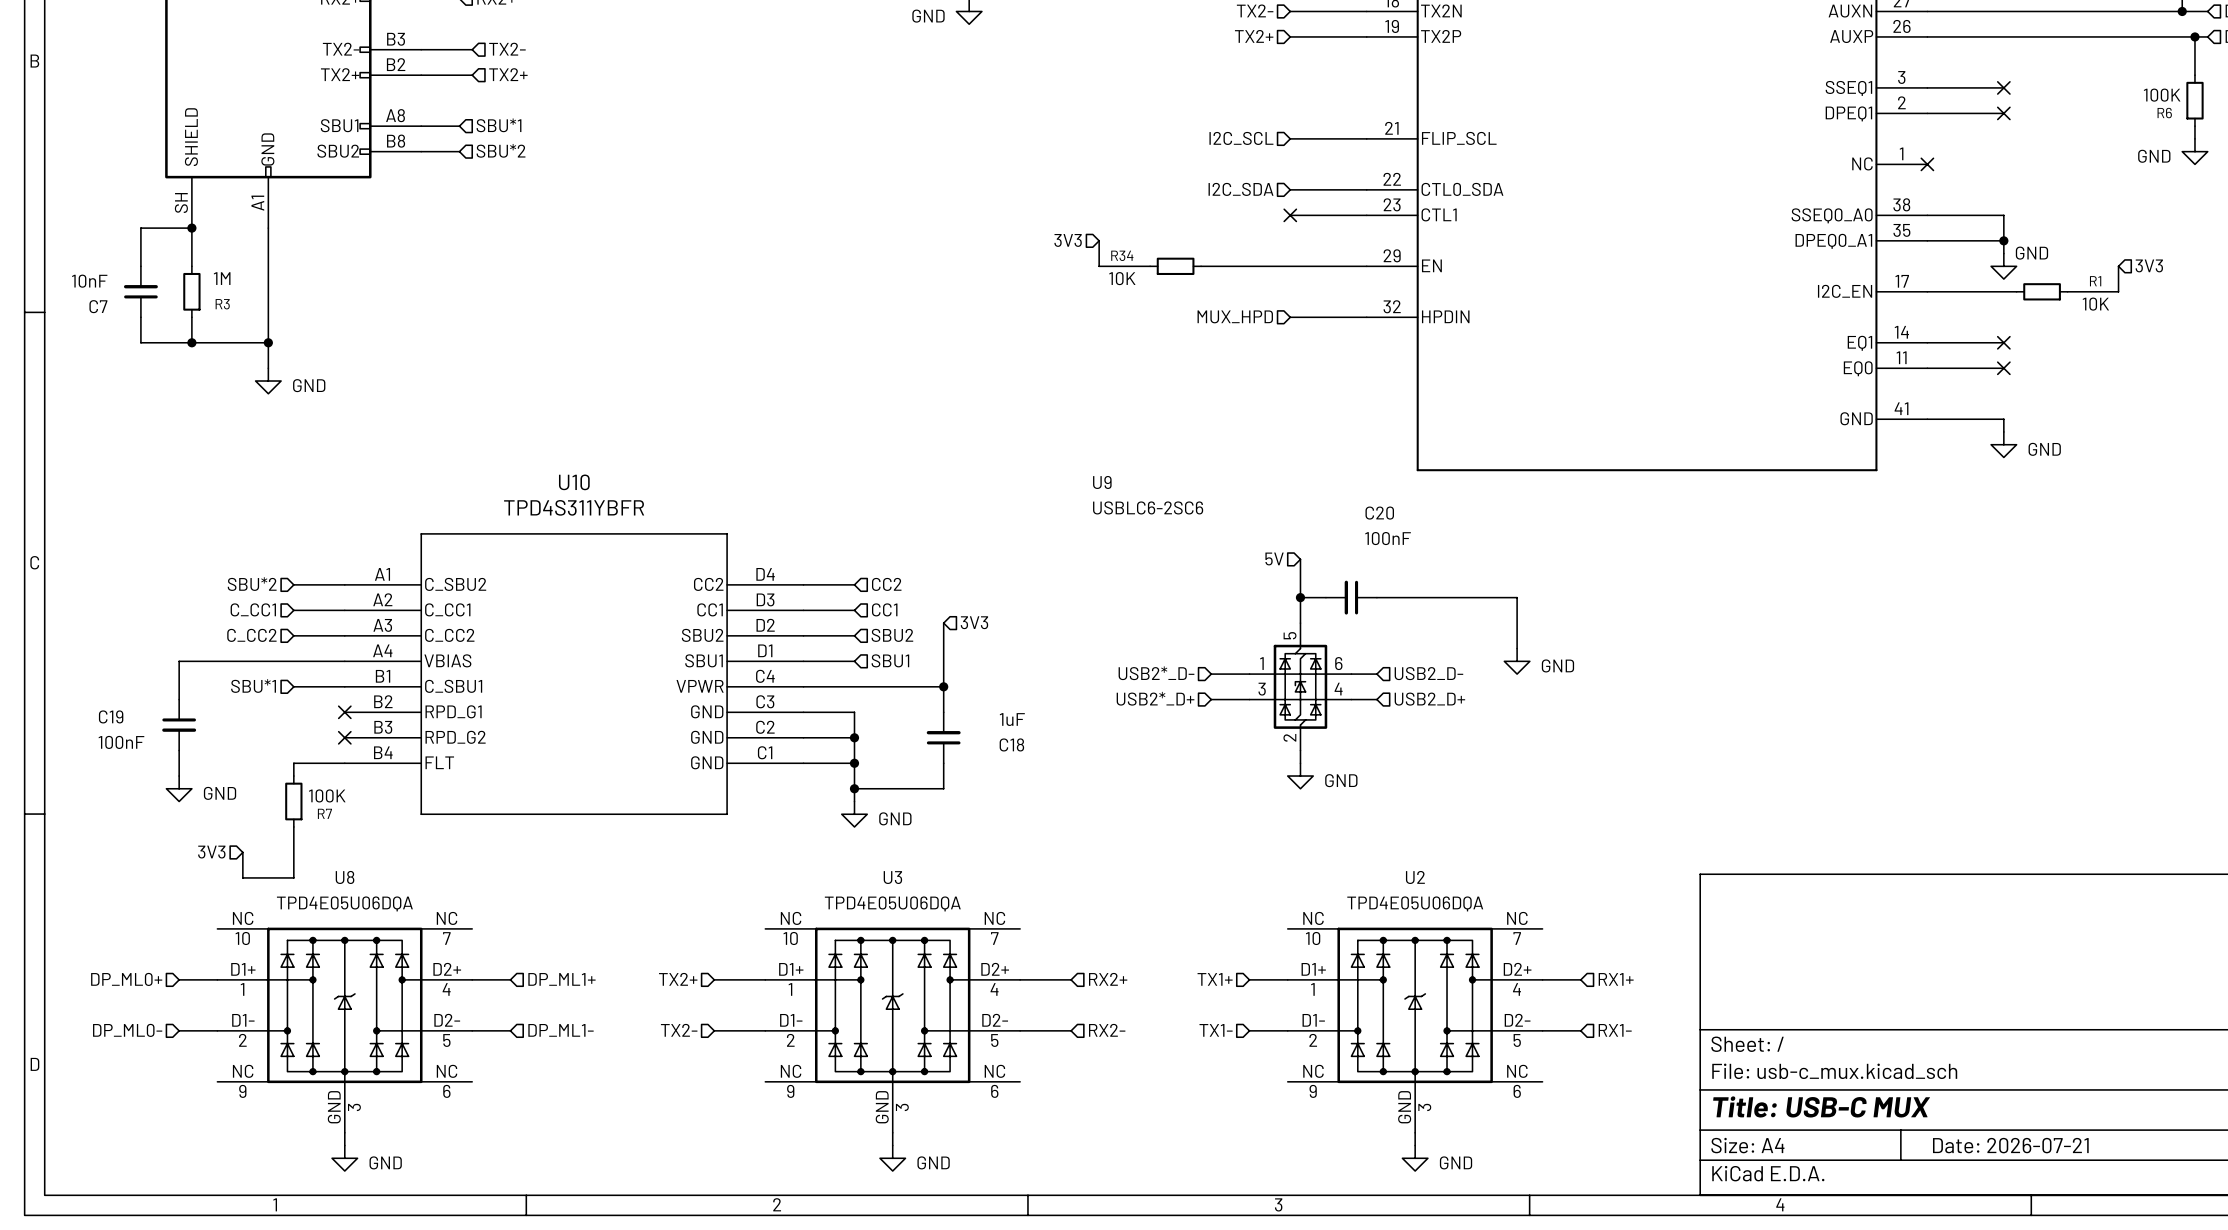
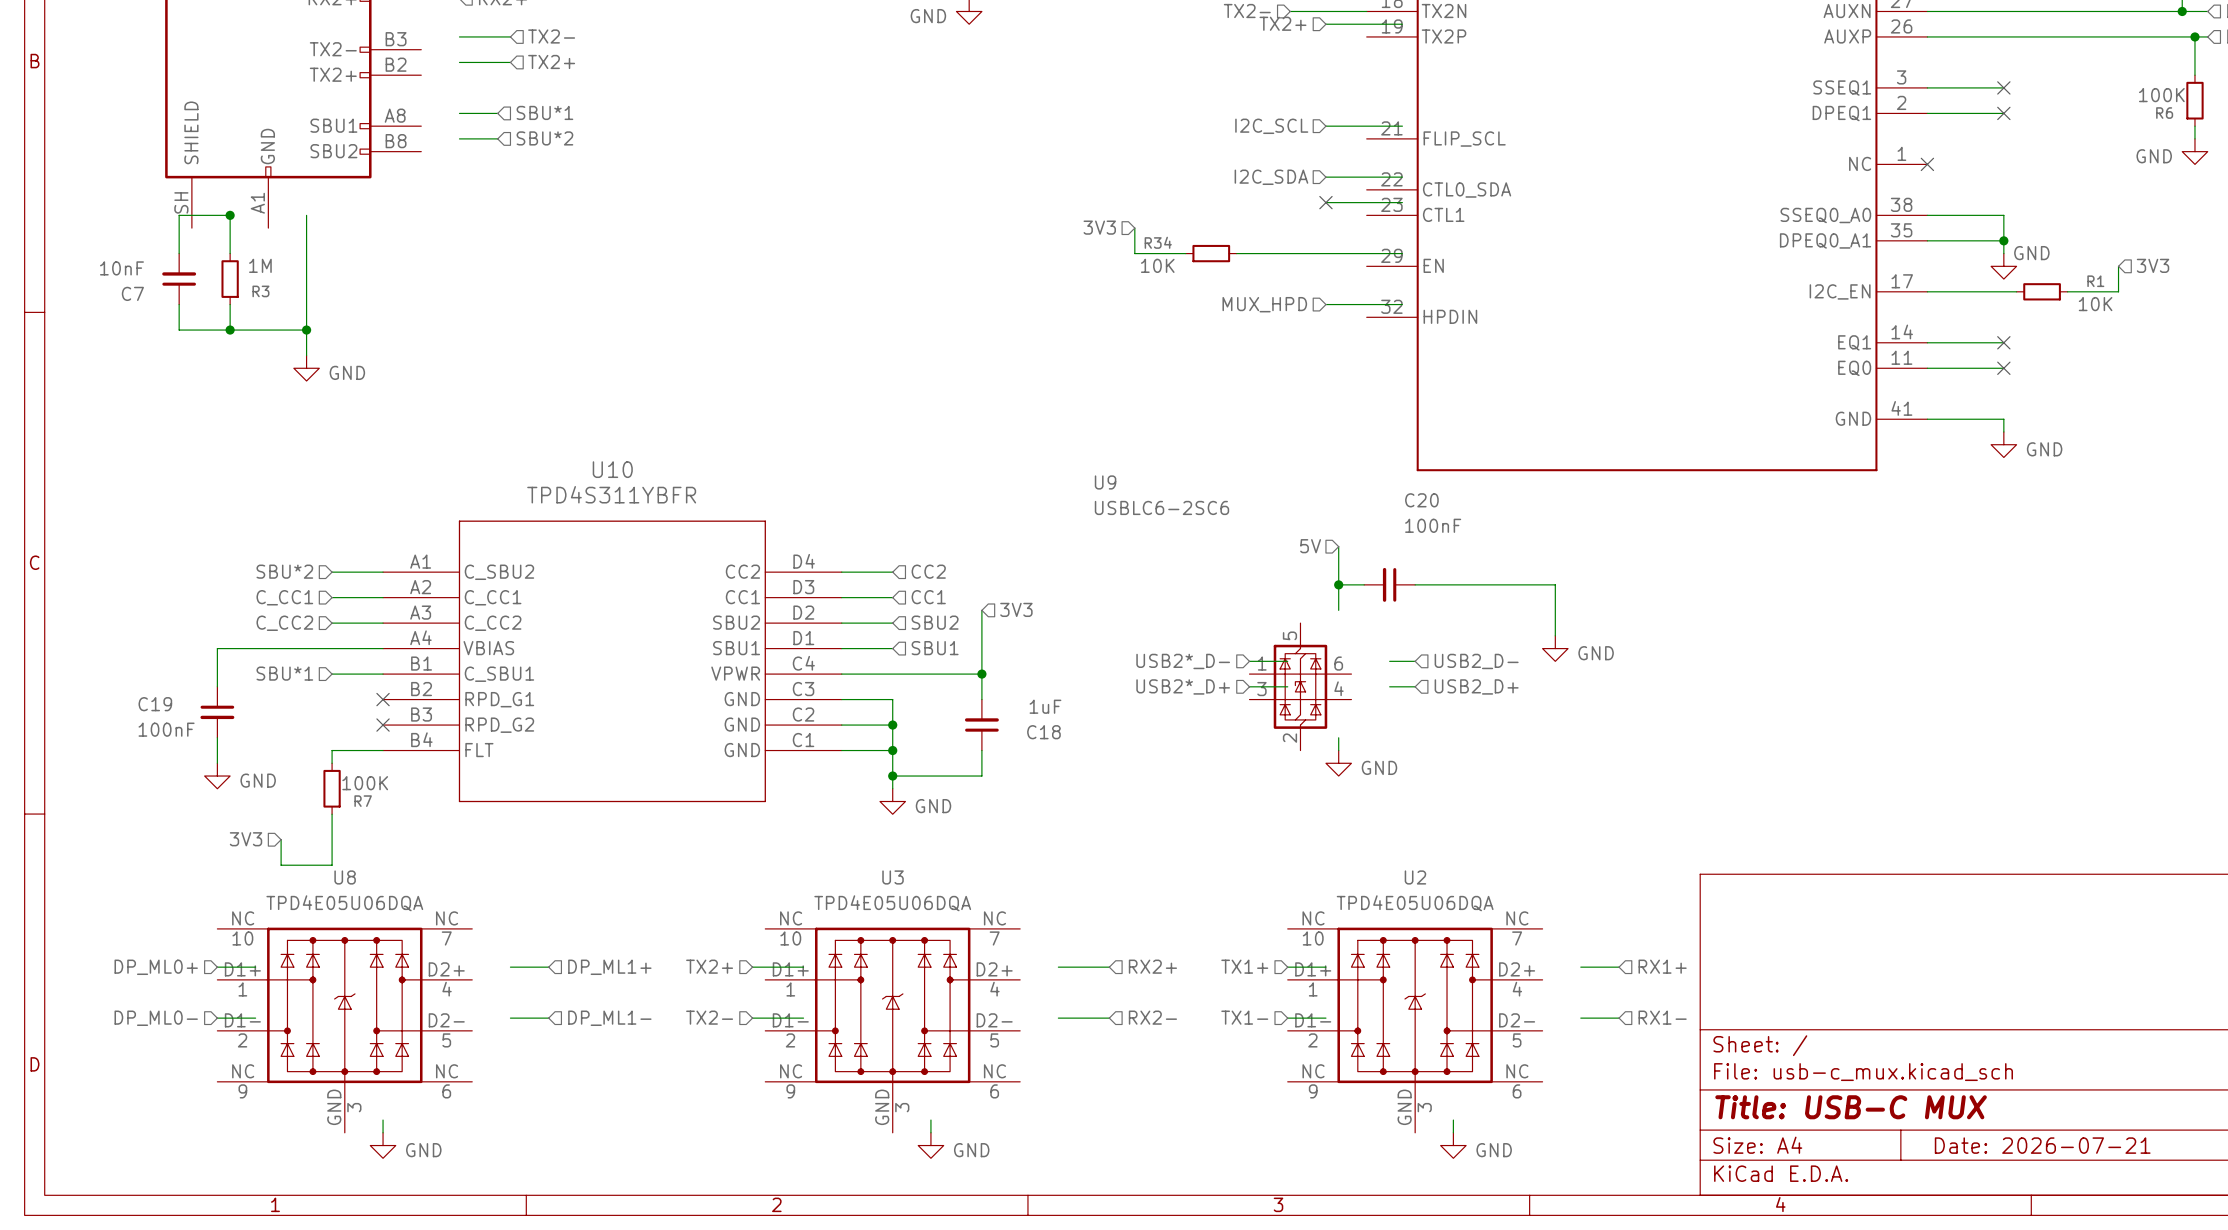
hierarchical label position: TX2+ (1254, 36) -> TX2+ (1282, 23)
wire: (1290, 36) (1366, 36) -> (1325, 24) (1402, 24)
wire: (421, 49) (472, 49) -> (459, 36) (510, 36)
hierarchical label position: TX2- (507, 49) -> TX2- (551, 36)
hierarchical label position: TX2+ (508, 74) -> TX2+ (551, 61)
wire: (421, 75) (472, 75) -> (459, 62) (510, 62)
hierarchical label position: SBU*1 (499, 125) -> SBU*1 (544, 112)
wire: (421, 126) (459, 126) -> (459, 113) (497, 113)
hierarchical label position: I2C_SCL (1241, 138) -> I2C_SCL (1271, 126)
wire: (1290, 138) (1366, 138) -> (1325, 126) (1402, 126)
hierarchical label position: SBU*2 (501, 150) -> SBU*2 (544, 138)
wire: (421, 151) (459, 151) -> (459, 138) (497, 138)
hierarchical label position: I2C_SDA (1241, 189) -> I2C_SDA (1271, 177)
wire: (1290, 189) (1366, 189) -> (1325, 177) (1402, 177)
wire: (1290, 215) (1366, 215) -> (1325, 202) (1402, 202)
no-connect mark position: (1290, 215) -> (1325, 202)
junction position: (191, 228) -> (230, 215)
wire: (268, 228) (268, 368) -> (306, 215) (306, 355)
hierarchical label position: 3V3 (1068, 240) -> 3V3 (1099, 227)
wire: (1099, 240) (1099, 266) (1150, 266) -> (1134, 228) (1134, 253) (1185, 253)
wire: (140, 266) (140, 228) (191, 228) (191, 266) -> (179, 253) (179, 215) (230, 215) (230, 253)
R34 position: (1175, 266) -> (1211, 253)
wire: (1201, 266) (1366, 266) -> (1236, 253) (1402, 253)
C7 position: (140, 291) -> (179, 279)
R3 position: (191, 291) -> (230, 279)
hierarchical label position: MUX_HPD (1235, 316) -> MUX_HPD (1264, 304)
wire: (140, 317) (140, 342) (268, 342) -> (179, 304) (179, 330) (306, 330)
wire: (191, 317) (191, 342) -> (230, 304) (230, 330)
wire: (1290, 317) (1366, 317) -> (1325, 304) (1402, 304)
junction: none -> (230, 330)
junction: none -> (306, 330)
junction: (191, 342) -> none
junction: (268, 342) -> none
power symbol position: GND (268, 381) -> GND (306, 368)
hierarchical label position: 5V (1274, 558) -> 5V (1310, 546)
wire: (1300, 559) (1300, 623) -> (1338, 546) (1338, 610)
hierarchical label position: SBU*2 (252, 584) -> SBU*2 (284, 571)
wire: (293, 584) (344, 584) -> (332, 572) (383, 572)
wire: (803, 584) (854, 584) -> (841, 572) (892, 572)
hierarchical label position: CC2 (886, 584) -> CC2 (928, 571)
wire: (1300, 597) (1325, 597) -> (1338, 584) (1364, 584)
junction position: (1300, 597) -> (1338, 584)
C20 position: (1351, 597) -> (1389, 584)
wire: (1376, 597) (1517, 597) (1517, 648) -> (1415, 584) (1555, 584) (1555, 635)
hierarchical label position: C_CC1 (253, 609) -> C_CC1 (284, 597)
hierarchical label position: CC1 (884, 609) -> CC1 (928, 597)
wire: (293, 610) (344, 610) -> (332, 597) (383, 597)
wire: (803, 610) (854, 610) -> (841, 597) (892, 597)
hierarchical label position: 3V3 (974, 622) -> 3V3 (1016, 609)
wire: (943, 623) (943, 712) -> (981, 610) (981, 699)
hierarchical label position: C_CC2 (251, 635) -> C_CC2 (284, 623)
wire: (293, 635) (344, 635) -> (332, 623) (383, 623)
wire: (803, 635) (854, 635) -> (841, 623) (892, 623)
hierarchical label position: SBU2 (892, 635) -> SBU2 (935, 622)
hierarchical label position: SBU1 (890, 660) -> SBU1 (935, 648)
wire: (344, 661) (179, 661) (179, 699) -> (383, 648) (217, 648) (217, 686)
wire: (803, 661) (854, 661) -> (841, 648) (892, 648)
power symbol position: GND (1517, 661) -> GND (1555, 648)
hierarchical label position: USB2*_D- (1156, 673) -> USB2*_D- (1183, 661)
hierarchical label position: USB2_D- (1428, 673) -> USB2_D- (1476, 661)
U10 position: (574, 674) -> (612, 661)
junction: none -> (981, 674)
wire: (1211, 674) (1249, 674) -> (1249, 661) (1287, 661)
wire: (1351, 674) (1376, 674) -> (1389, 661) (1415, 661)
hierarchical label position: SBU*1 (253, 685) -> SBU*1 (284, 673)
wire: (293, 686) (344, 686) -> (332, 674) (383, 674)
wire: (803, 686) (943, 686) -> (841, 674) (981, 674)
junction: (943, 686) -> none
hierarchical label position: USB2*_D+ (1155, 698) -> USB2*_D+ (1183, 686)
no-connect mark: none -> (383, 699)
wire: (1211, 699) (1249, 699) -> (1249, 686) (1287, 686)
wire: (1351, 699) (1376, 699) -> (1389, 686) (1415, 686)
hierarchical label position: USB2_D+ (1429, 699) -> USB2_D+ (1476, 686)
no-connect mark: (344, 712) -> none
wire: (803, 712) (854, 712) (854, 801) -> (841, 699) (892, 699) (892, 788)
C19 position: (179, 725) -> (217, 712)
no-connect mark: none -> (383, 725)
junction: none -> (892, 725)
no-connect mark: (344, 737) -> none
wire: (803, 737) (854, 737) -> (841, 725) (892, 725)
junction: (854, 737) -> none
C18 position: (943, 737) -> (981, 725)
wire: (179, 750) (179, 776) -> (217, 737) (217, 763)
junction: none -> (892, 750)
wire: (1300, 750) (1300, 763) -> (1338, 737) (1338, 750)
wire: (344, 763) (293, 763) (293, 776) -> (383, 750) (332, 750) (332, 763)
wire: (803, 763) (854, 763) -> (841, 750) (892, 750)
junction: (854, 763) -> none
wire: (943, 763) (943, 788) (854, 788) -> (981, 750) (981, 776) (892, 776)
junction: none -> (892, 776)
power symbol position: GND (1300, 776) -> GND (1338, 763)
power symbol position: GND (179, 788) -> GND (217, 776)
junction: (854, 788) -> none
R7 position: (293, 801) -> (332, 788)
power symbol position: GND (854, 814) -> GND (892, 801)
wire: (293, 826) (293, 877) (242, 877) (242, 852) -> (332, 814) (332, 865) (281, 865) (281, 839)
hierarchical label position: 3V3 (211, 852) -> 3V3 (246, 839)
hierarchical label position: DP_ML0+ (126, 979) -> DP_ML0+ (156, 967)
wire: (179, 979) (217, 979) -> (217, 967) (255, 967)
wire: (472, 979) (510, 979) -> (510, 967) (548, 967)
hierarchical label position: DP_ML1+ (561, 979) -> DP_ML1+ (609, 967)
hierarchical label position: TX2+ (678, 979) -> TX2+ (709, 966)
wire: (714, 979) (765, 979) -> (752, 967) (803, 967)
wire: (1020, 979) (1071, 979) -> (1058, 967) (1109, 967)
hierarchical label position: RX2+ (1108, 979) -> RX2+ (1152, 966)
hierarchical label position: TX1+ (1215, 979) -> TX1+ (1244, 966)
wire: (1249, 979) (1287, 979) -> (1287, 967) (1325, 967)
wire: (1542, 979) (1580, 979) -> (1580, 967) (1619, 967)
hierarchical label position: RX1+ (1616, 979) -> RX1+ (1662, 966)
hierarchical label position: DP_ML0- (127, 1030) -> DP_ML0- (156, 1018)
wire: (179, 1030) (217, 1030) -> (217, 1018) (255, 1018)
wire: (472, 1030) (510, 1030) -> (510, 1018) (548, 1018)
hierarchical label position: DP_ML1- (561, 1030) -> DP_ML1- (609, 1018)
hierarchical label position: TX2- (679, 1030) -> TX2- (709, 1017)
wire: (714, 1030) (765, 1030) -> (752, 1018) (803, 1018)
wire: (1020, 1030) (1071, 1030) -> (1058, 1018) (1109, 1018)
hierarchical label position: RX2- (1107, 1030) -> RX2- (1152, 1017)
hierarchical label position: TX1- (1216, 1030) -> TX1- (1244, 1017)
wire: (1249, 1030) (1287, 1030) -> (1287, 1018) (1325, 1018)
wire: (1542, 1030) (1580, 1030) -> (1580, 1018) (1619, 1018)
hierarchical label position: RX1- (1615, 1030) -> RX1- (1662, 1017)
wire: (344, 1132) (344, 1145) -> (383, 1120) (383, 1132)
wire: (892, 1132) (892, 1145) -> (930, 1120) (930, 1132)
wire: (1415, 1132) (1415, 1145) -> (1453, 1120) (1453, 1132)
power symbol position: GND (344, 1158) -> GND (383, 1145)
power symbol position: GND (892, 1158) -> GND (930, 1145)
power symbol position: GND (1415, 1158) -> GND (1453, 1145)

